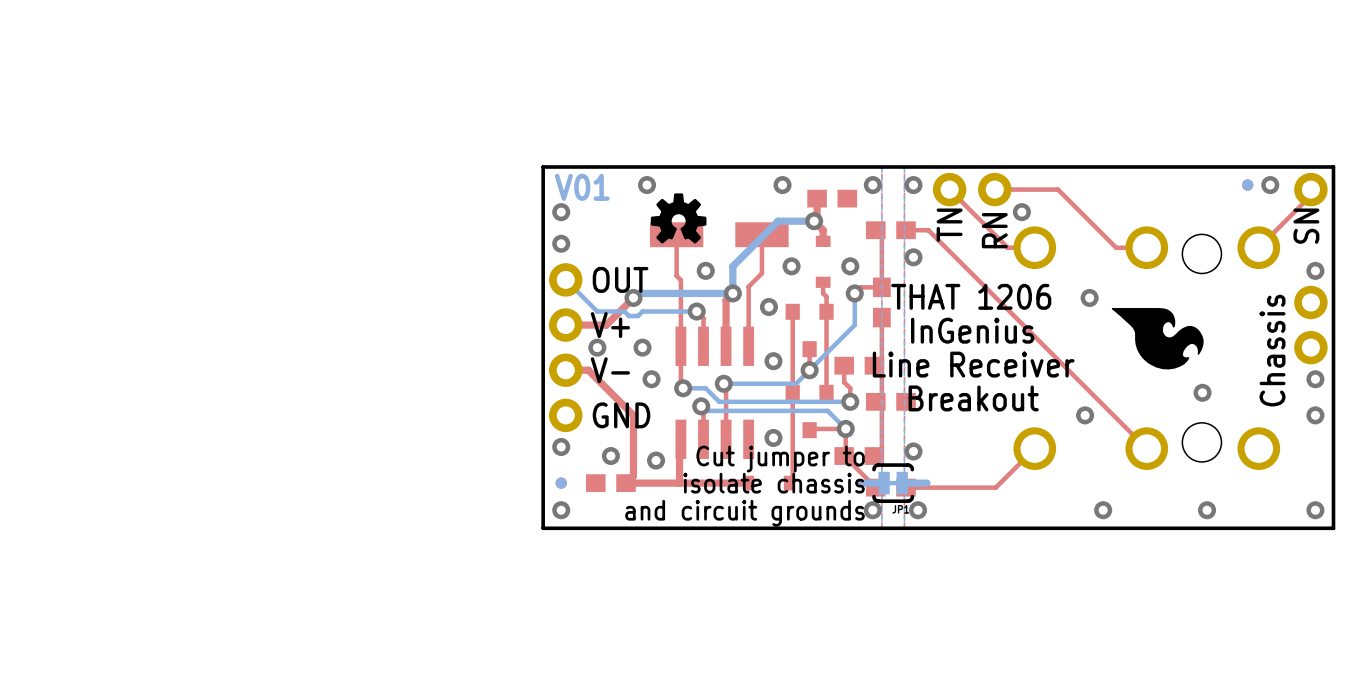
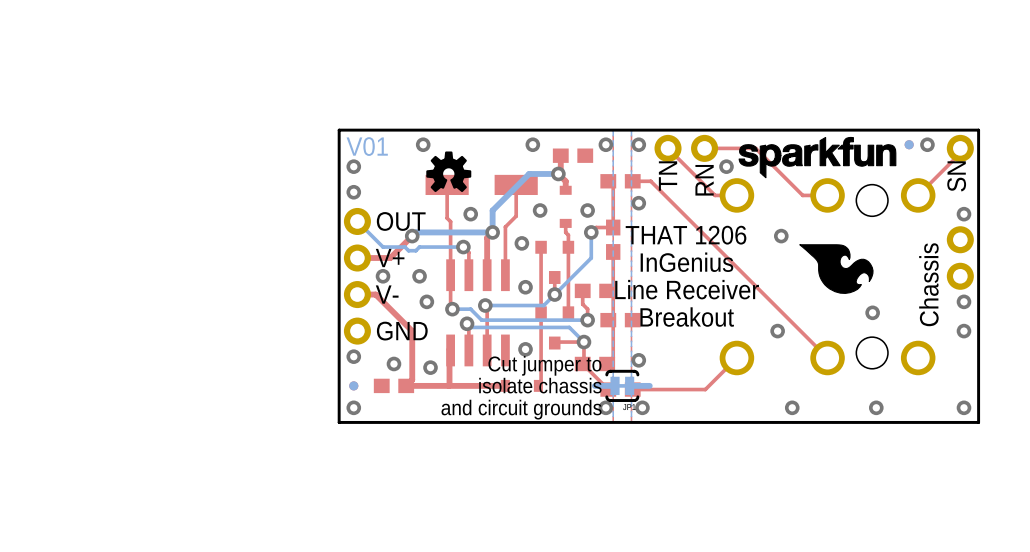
drawing: none -> [738, 136, 897, 179]

